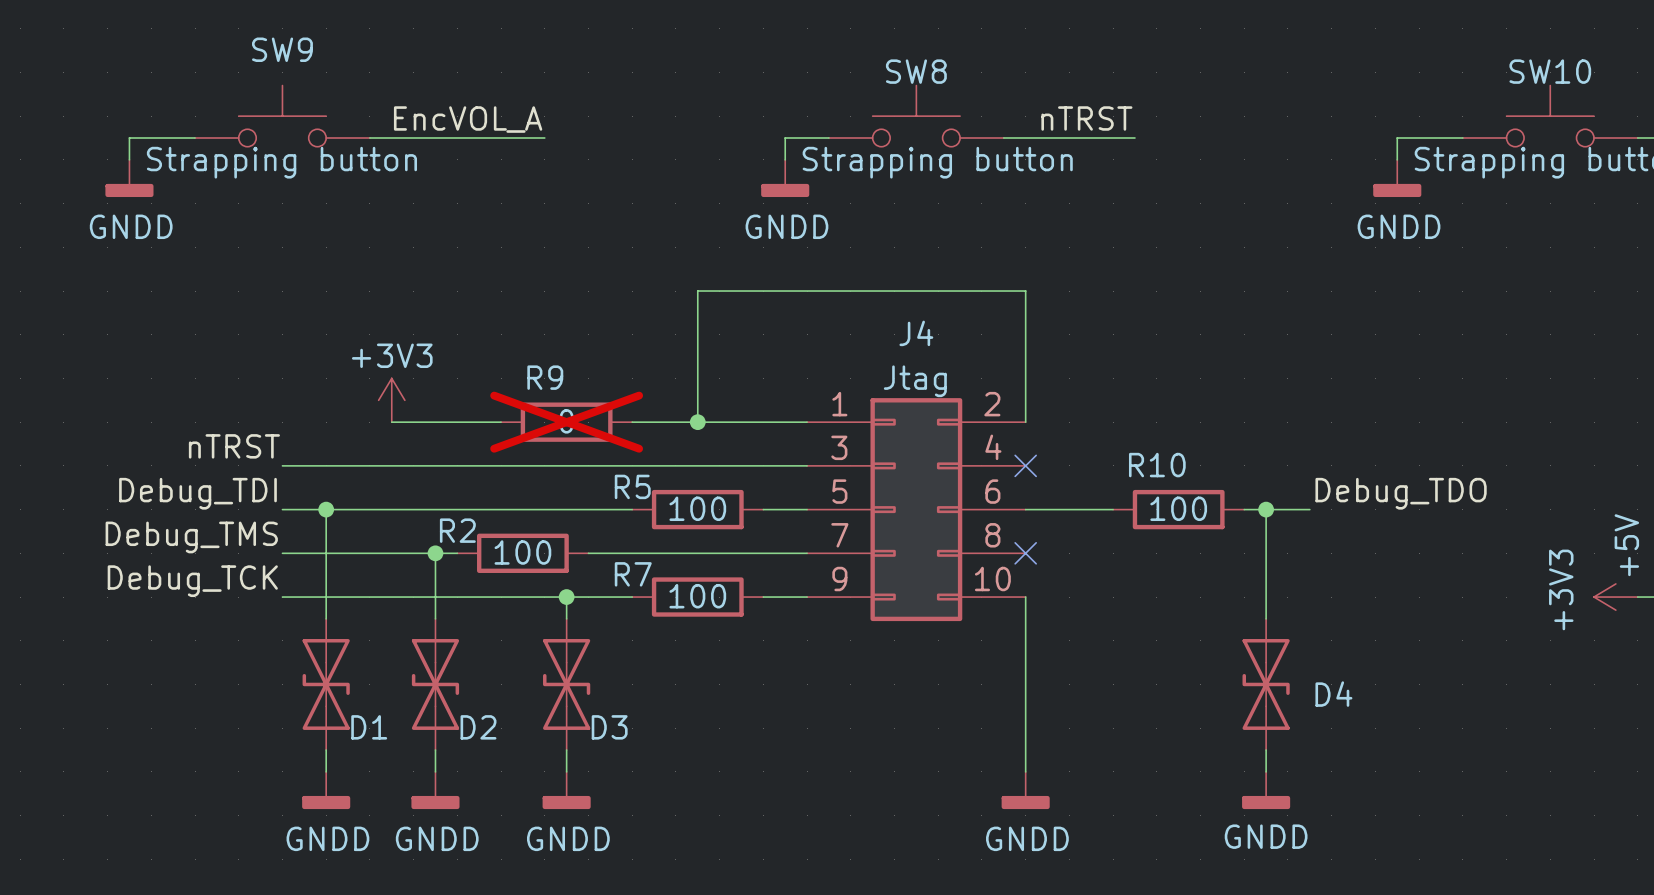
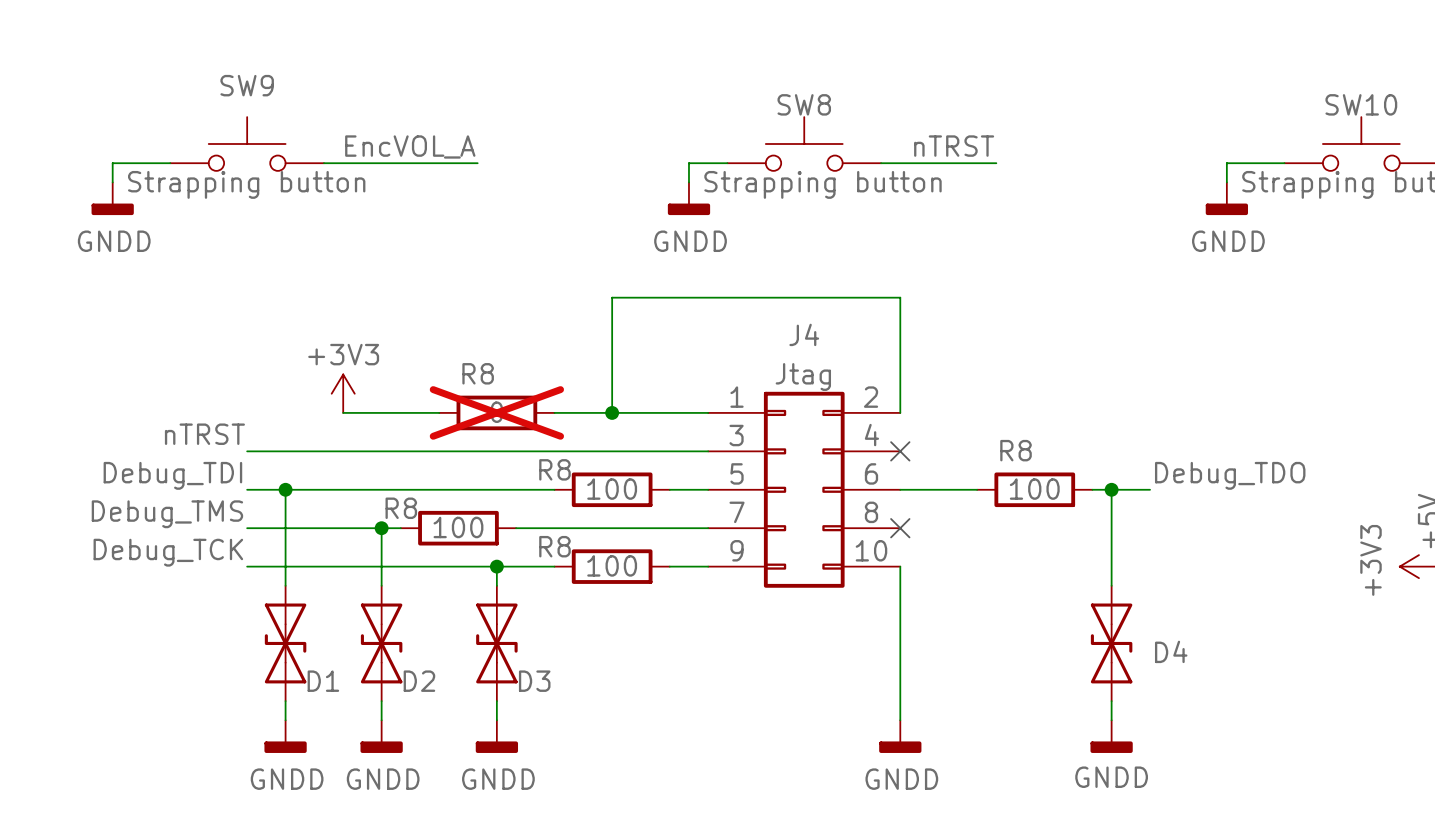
R9 name: R9 (545, 377) -> R8 (478, 373)
R10 name: R10 (1157, 465) -> R8 (1016, 450)
R5 name: R5 (632, 486) -> R8 (554, 469)
R2 name: R2 (457, 530) -> R8 (401, 508)
R7 name: R7 (633, 574) -> R8 (554, 546)

